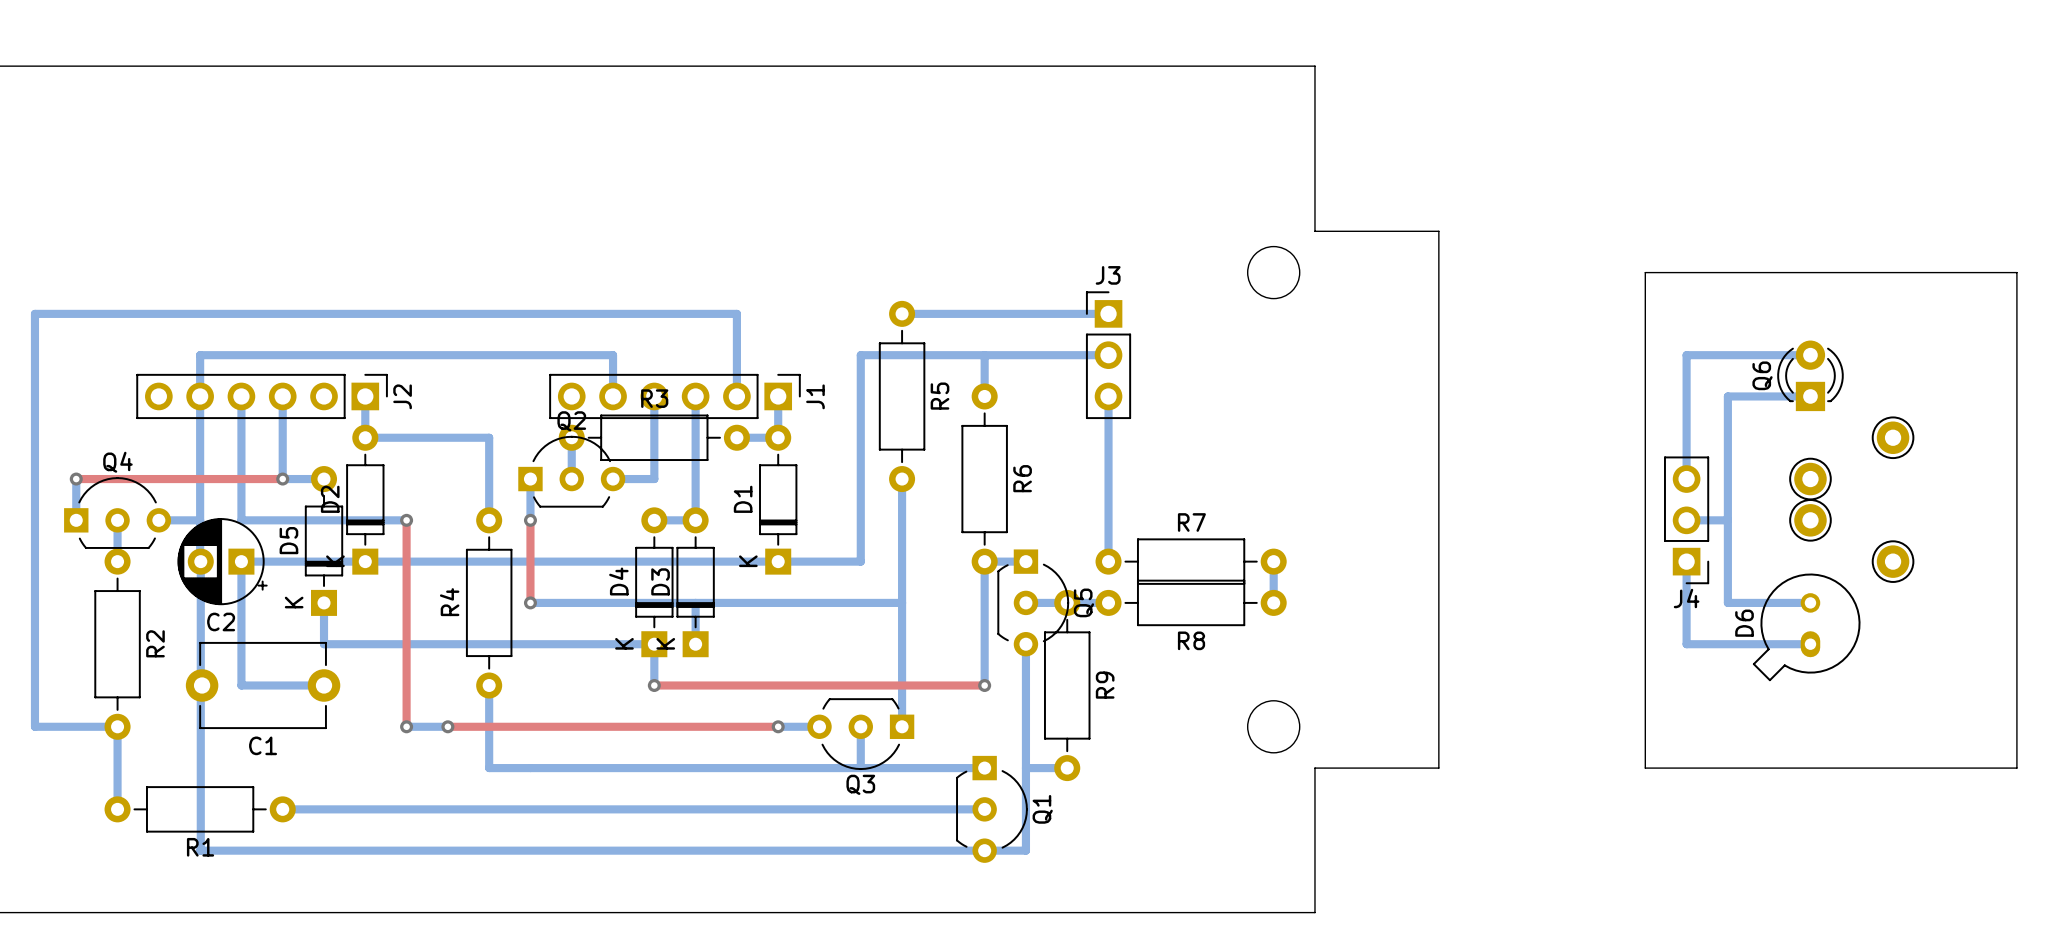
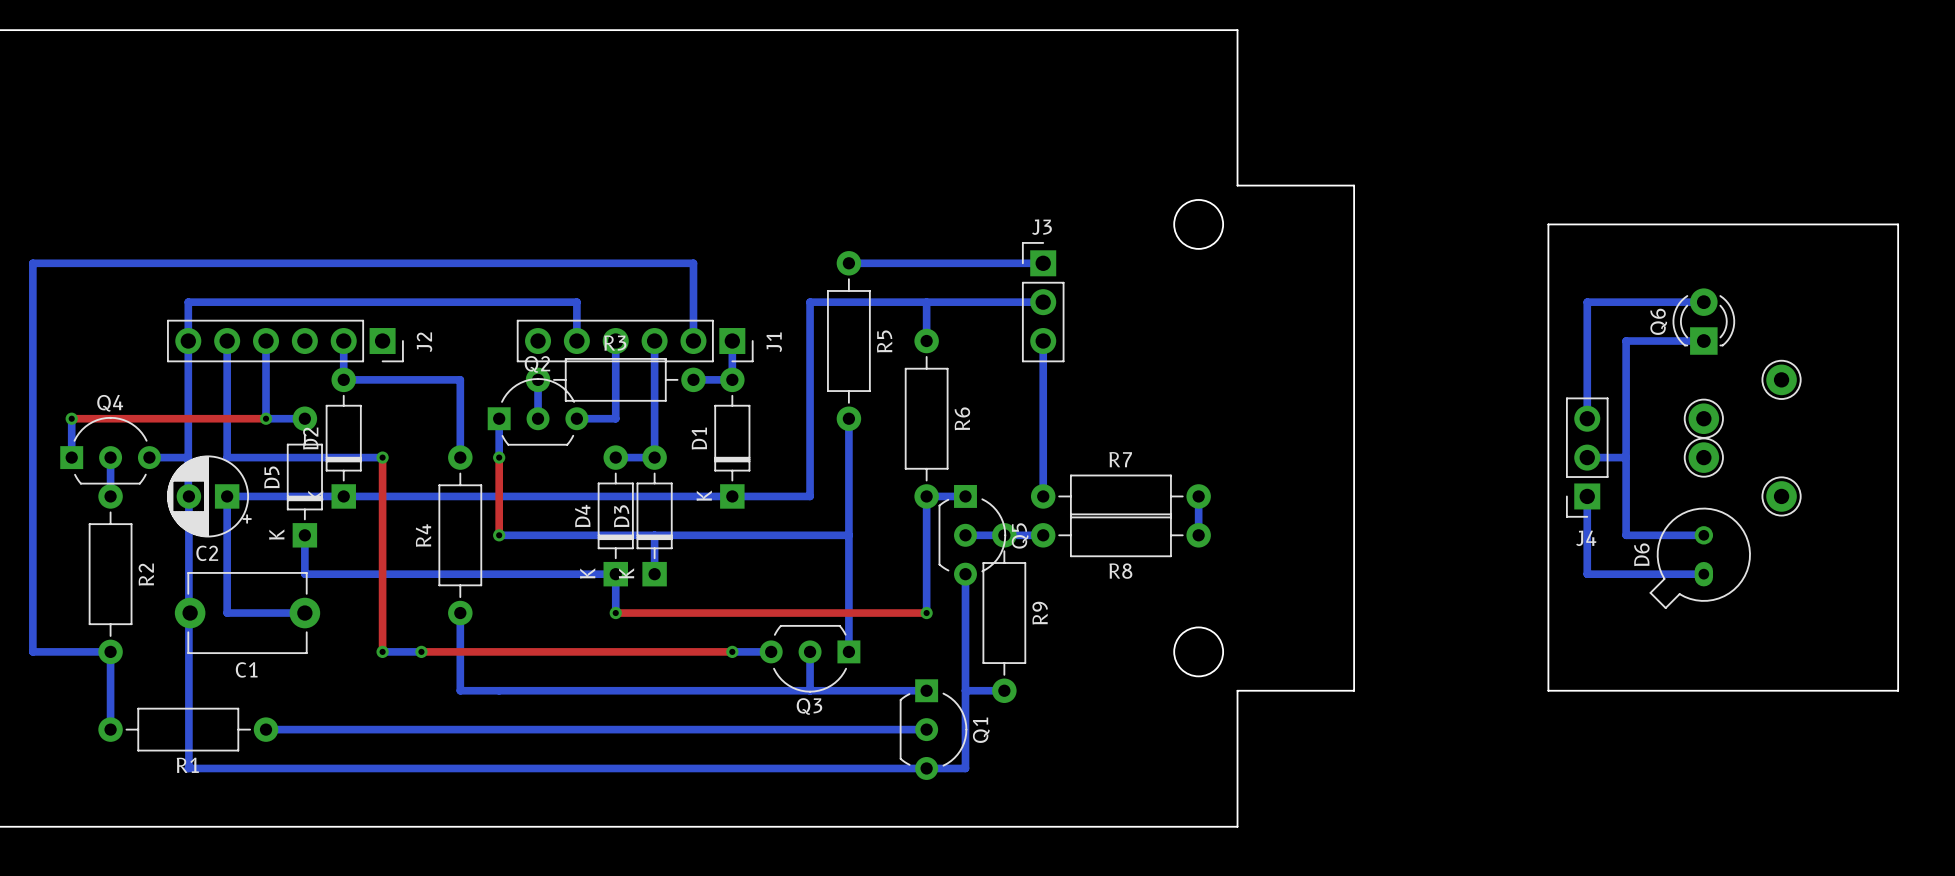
J2 footprint: [136, 373, 388, 420] -> [167, 319, 404, 363]
J1 footprint: [549, 373, 801, 420] -> [516, 319, 754, 363]
J4 footprint: [1664, 456, 1710, 585] -> [1565, 397, 1609, 518]

